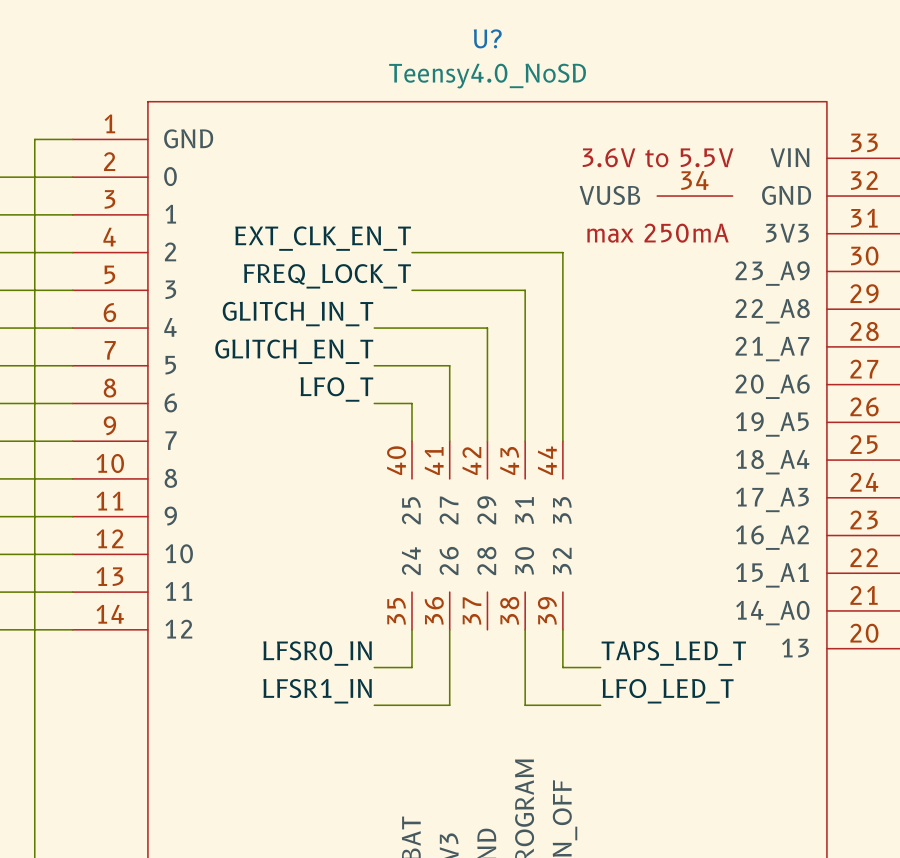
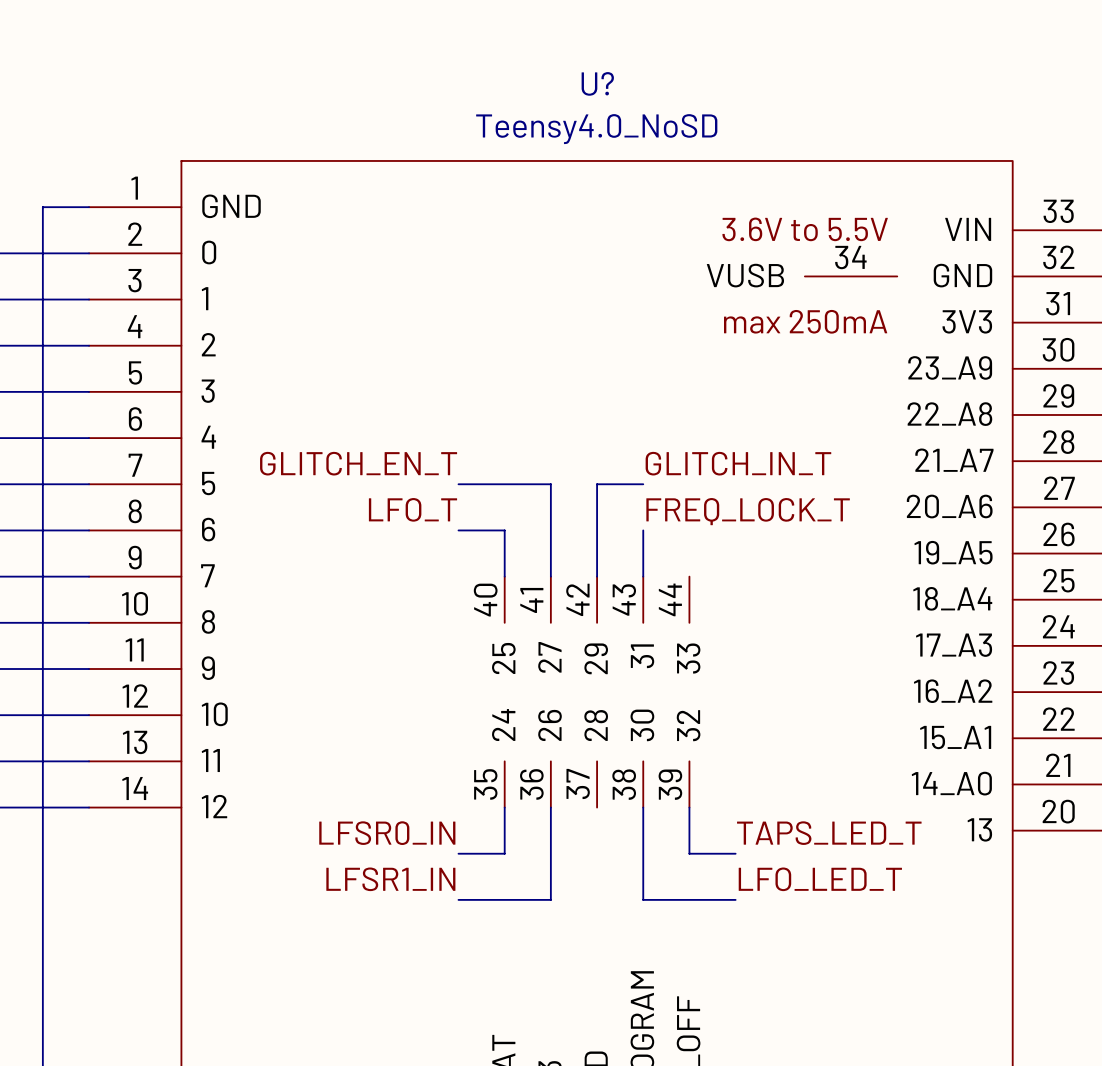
label: EXT_CLK_EN_T (323, 238) -> none
wire: (411, 252) (562, 252) (562, 441) -> none
label position: FREQ_LOCK_T (327, 276) -> FREQ_LOCK_T (748, 511)
wire: (411, 290) (525, 290) (525, 403) -> none
label position: GLITCH_IN_T (297, 314) -> GLITCH_IN_T (738, 463)
wire: (374, 328) (487, 328) (487, 365) -> (643, 484) (597, 484)

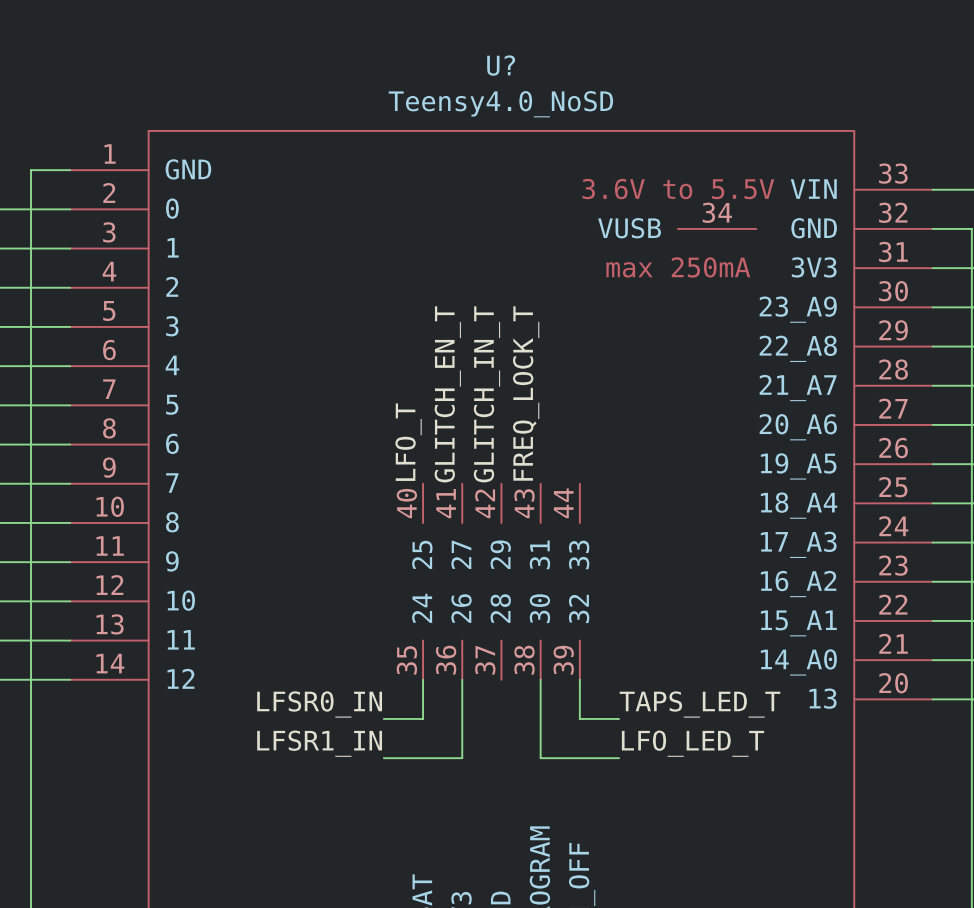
label rotation: 0° (358, 463) -> 90° counterclockwise (447, 394)
label rotation: 0° (738, 463) -> 90° counterclockwise (486, 394)
wire: (458, 484) (550, 484) (550, 576) -> none
wire: (643, 484) (597, 484) (597, 576) -> none
label rotation: 0° (412, 509) -> 90° counterclockwise (408, 442)
label rotation: 0° (748, 511) -> 90° counterclockwise (526, 393)
wire: (458, 530) (504, 530) (504, 576) -> none
wire: (643, 530) (643, 576) -> none

